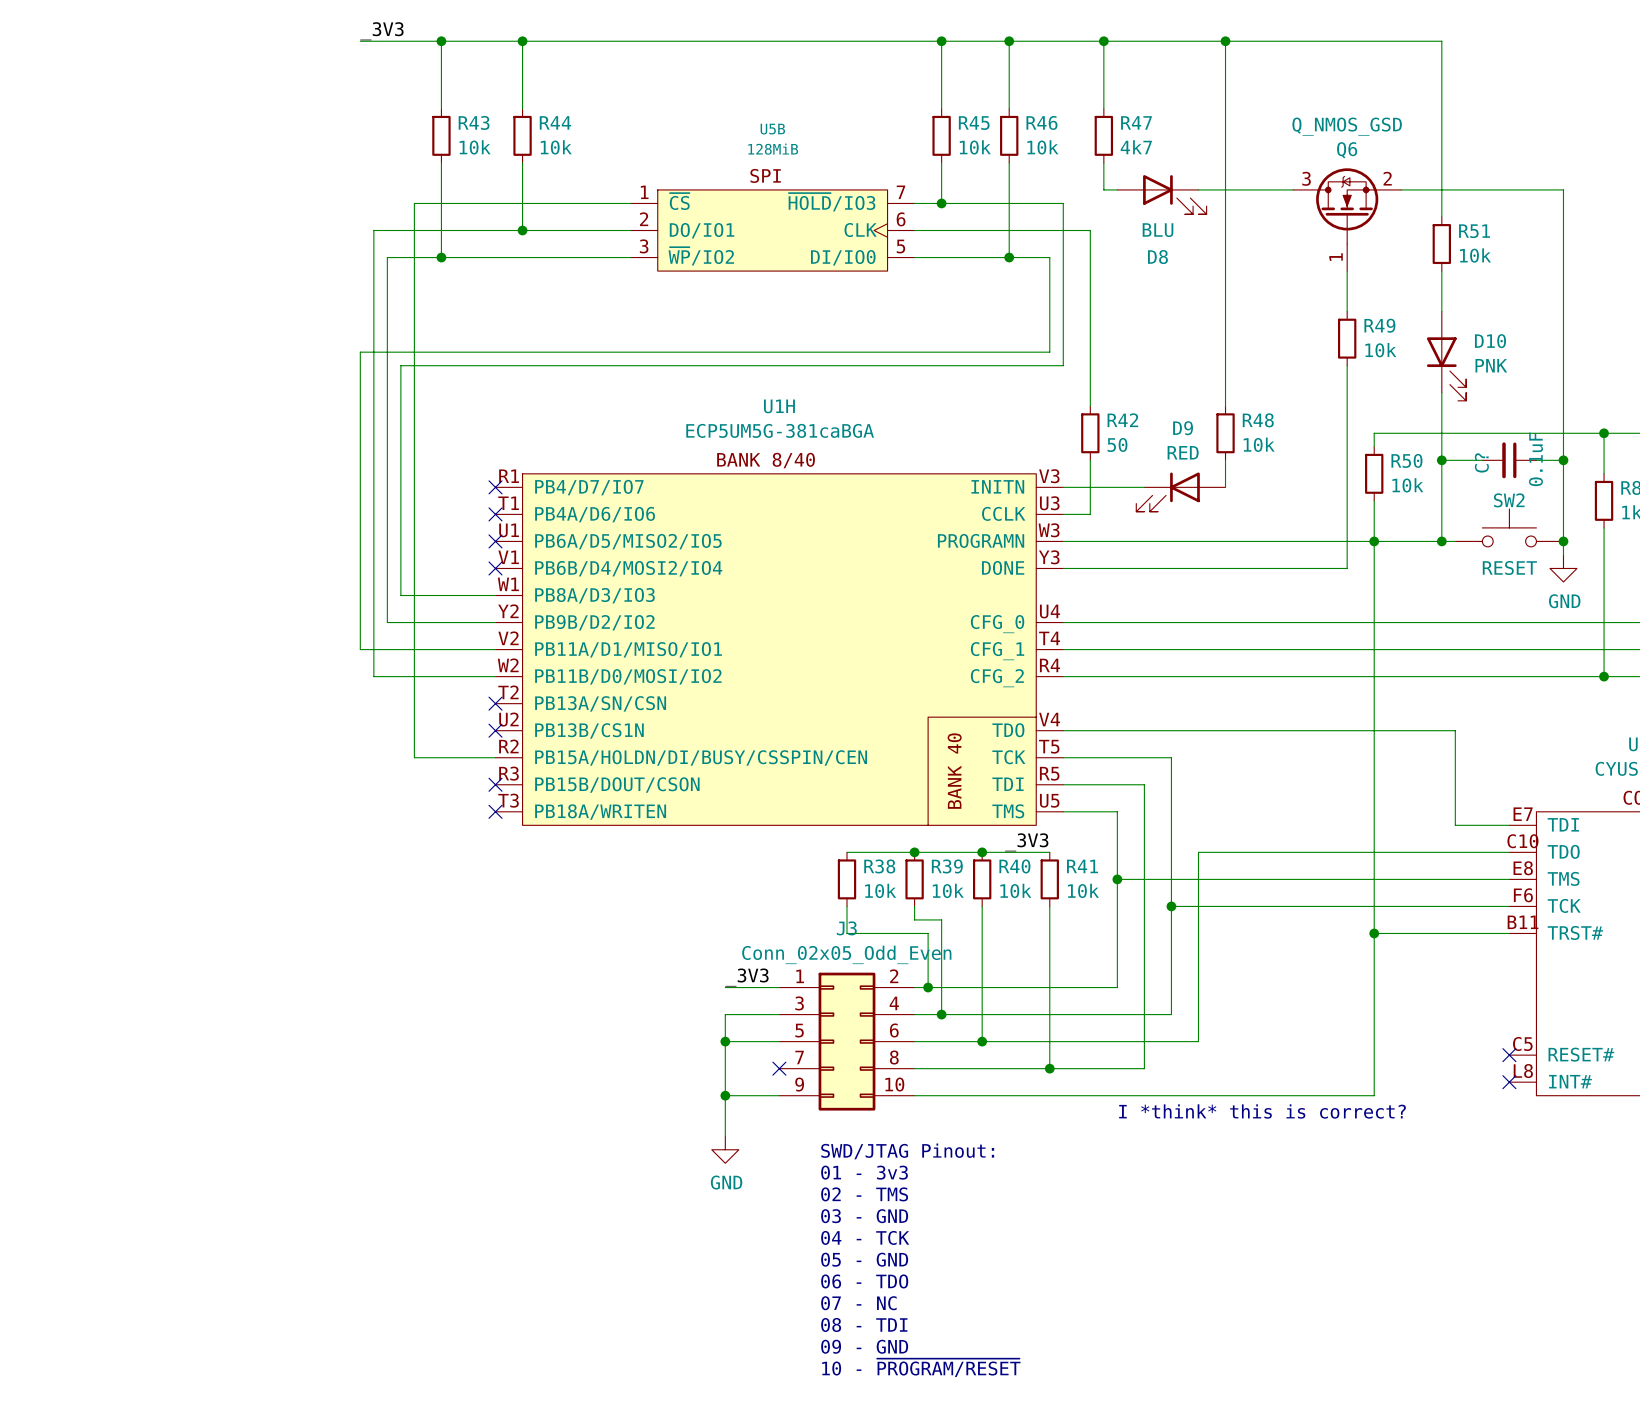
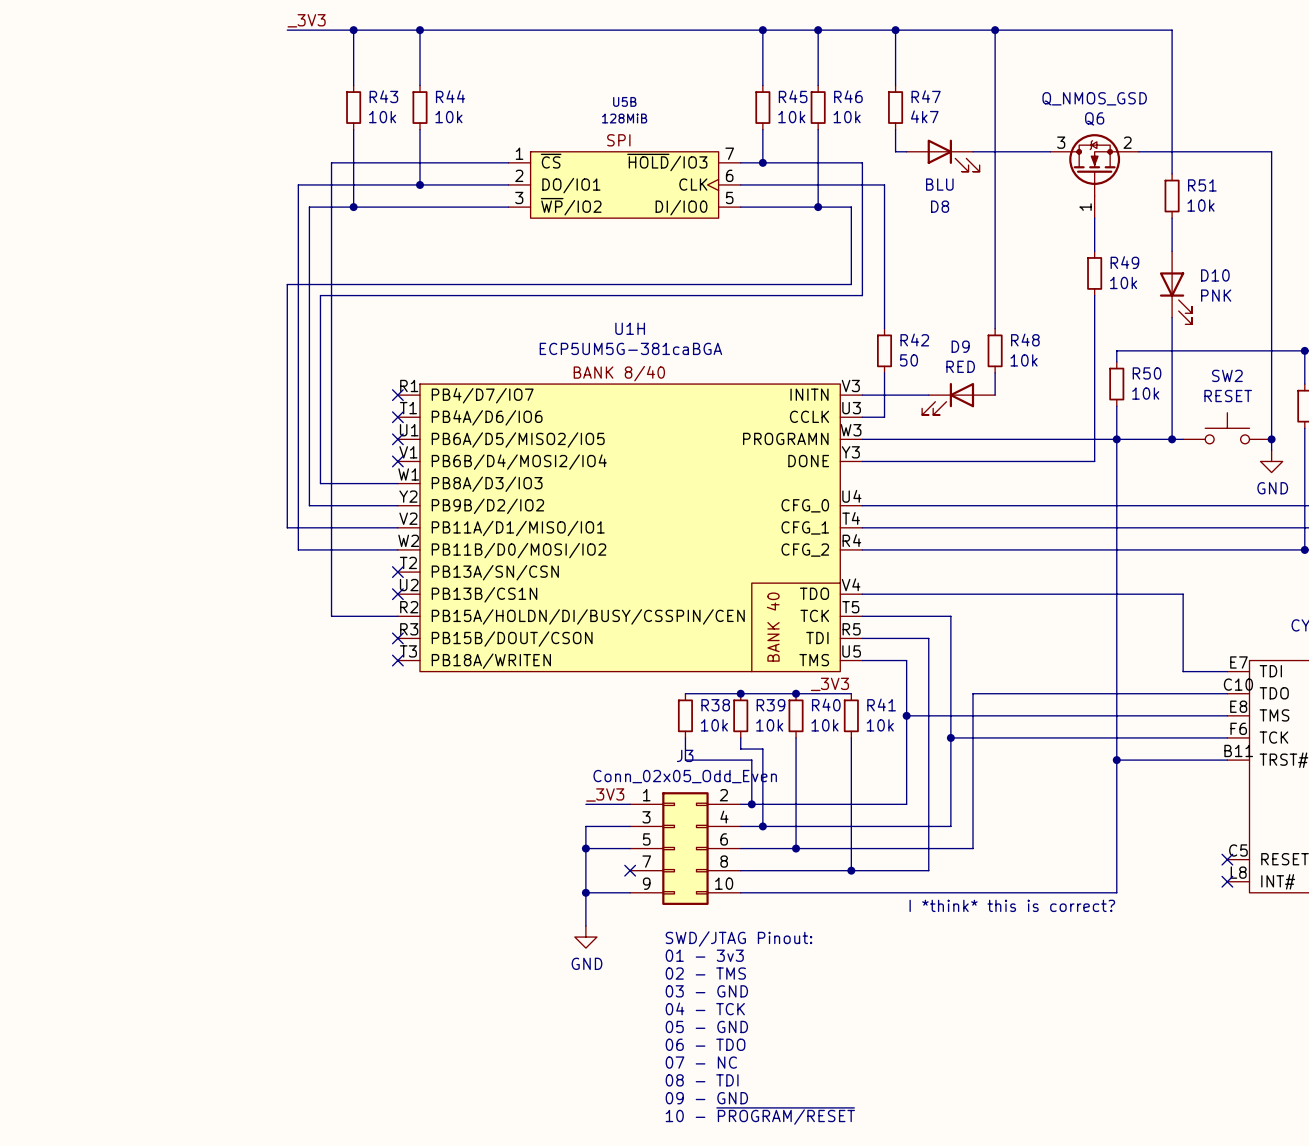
wire: (1441, 460) (1482, 460) -> none
junction: (1441, 460) -> none
C?: 0.1uF (1509, 460) -> none
wire: (1536, 460) (1563, 460) -> none
junction: (1563, 460) -> none
SW2 name position: SW2 (1509, 500) -> SW2 (1227, 375)
SW2 value position: RESET (1509, 567) -> RESET (1228, 396)

